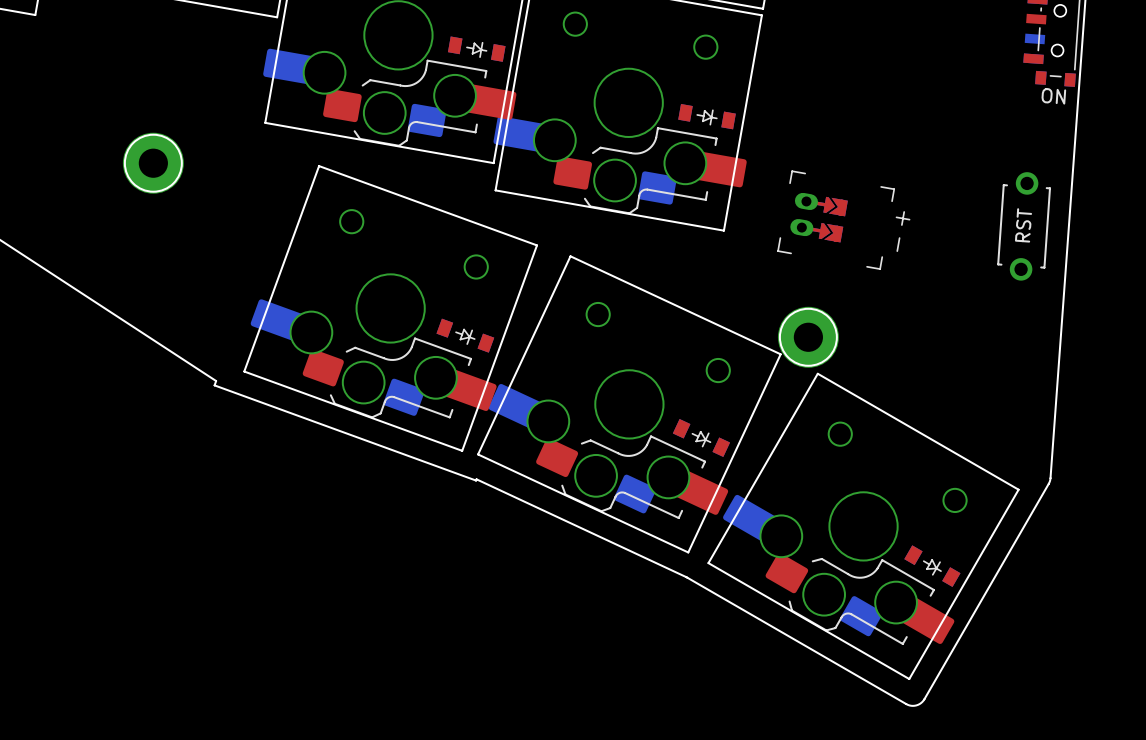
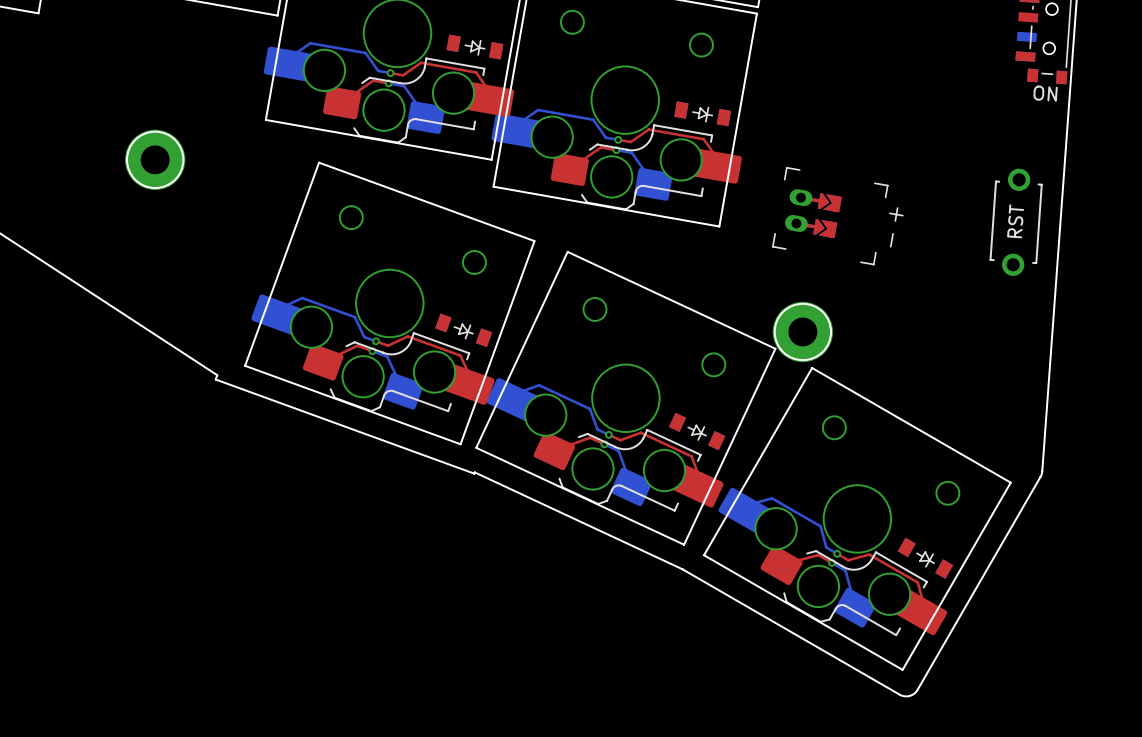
bottom track: none -> (282, 62) (310, 43) (365, 52) (378, 70) (390, 73)
top track: none -> (390, 73) (403, 75) (421, 62) (476, 72) (495, 100)
via: none -> (390, 73)
top track: none -> (388, 83) (373, 80) (341, 102)
bottom track: none -> (388, 83) (404, 86) (426, 117)
via: none -> (388, 83)
bottom track: none -> (509, 129) (538, 110) (593, 119) (605, 137) (618, 139)
top track: none -> (618, 139) (630, 142) (648, 129) (703, 139) (723, 167)
via: none -> (618, 139)
top track: none -> (616, 150) (600, 147) (569, 169)
bottom track: none -> (616, 150) (631, 152) (653, 184)
via: none -> (616, 150)
bottom track: none -> (271, 312) (302, 298) (354, 317) (364, 337) (376, 341)
top track: none -> (376, 341) (388, 345) (407, 336) (460, 355) (474, 386)
via: none -> (376, 341)
top track: none -> (372, 351) (357, 345) (322, 362)
bottom track: none -> (372, 351) (387, 356) (403, 391)
via: none -> (372, 351)
bottom track: none -> (506, 397) (539, 385) (589, 408) (597, 429) (608, 434)
top track: none -> (608, 434) (620, 440) (640, 432) (691, 456) (703, 488)
via: none -> (608, 434)
top track: none -> (604, 444) (590, 437) (554, 450)
bottom track: none -> (604, 444) (618, 450) (631, 487)
via: none -> (604, 444)
bottom track: none -> (738, 507) (772, 498) (820, 526) (826, 547) (837, 553)
top track: none -> (837, 553) (848, 560) (869, 554) (917, 582) (926, 615)
via: none -> (837, 553)
top track: none -> (832, 562) (818, 555) (781, 565)
bottom track: none -> (832, 562) (845, 570) (855, 607)
via: none -> (832, 562)

